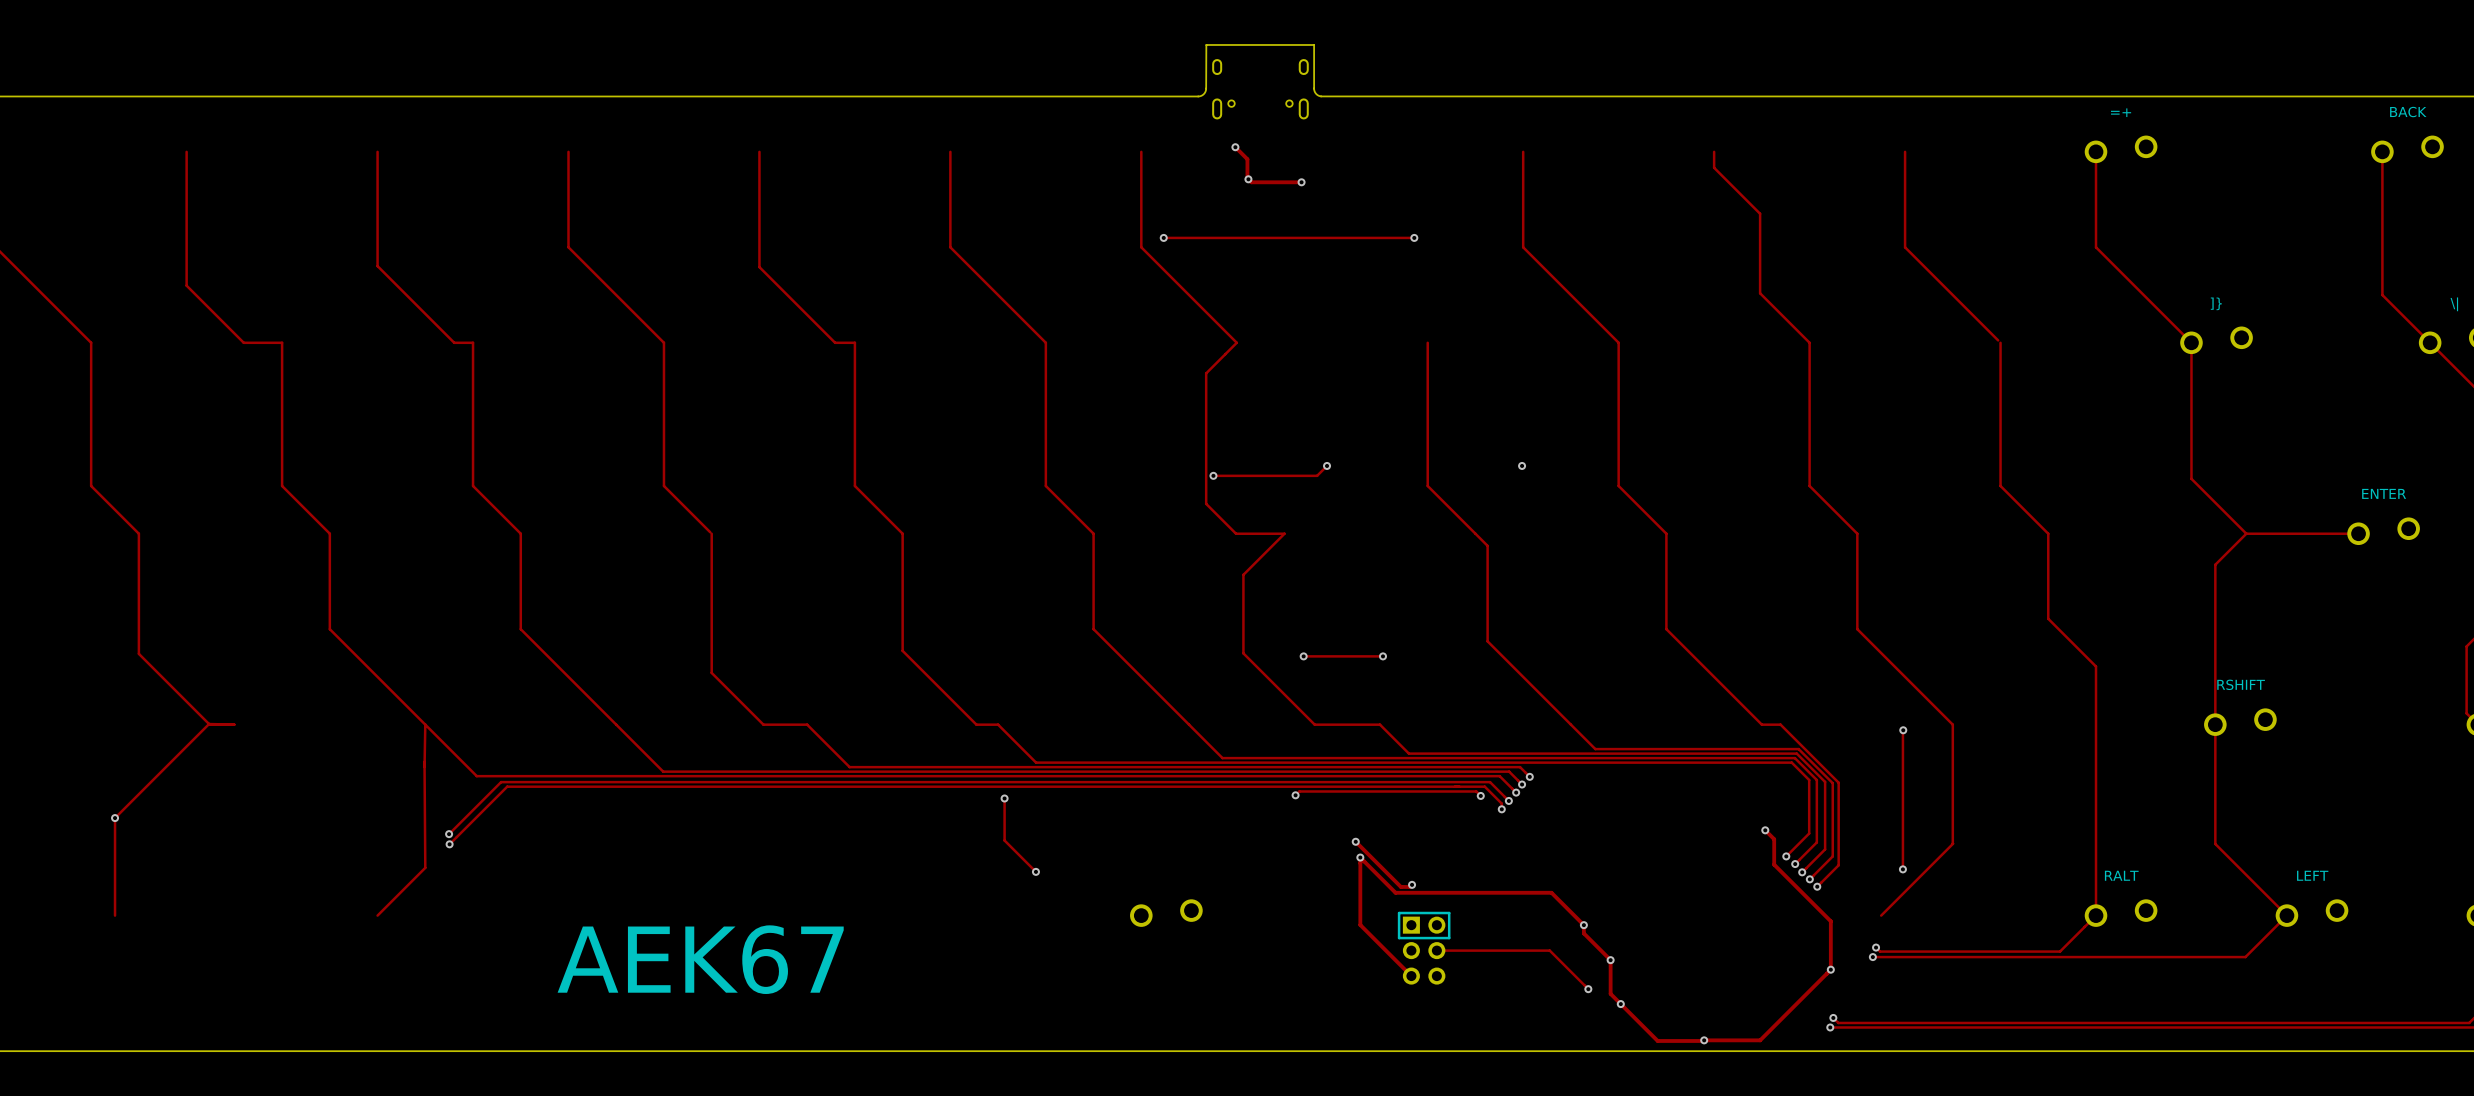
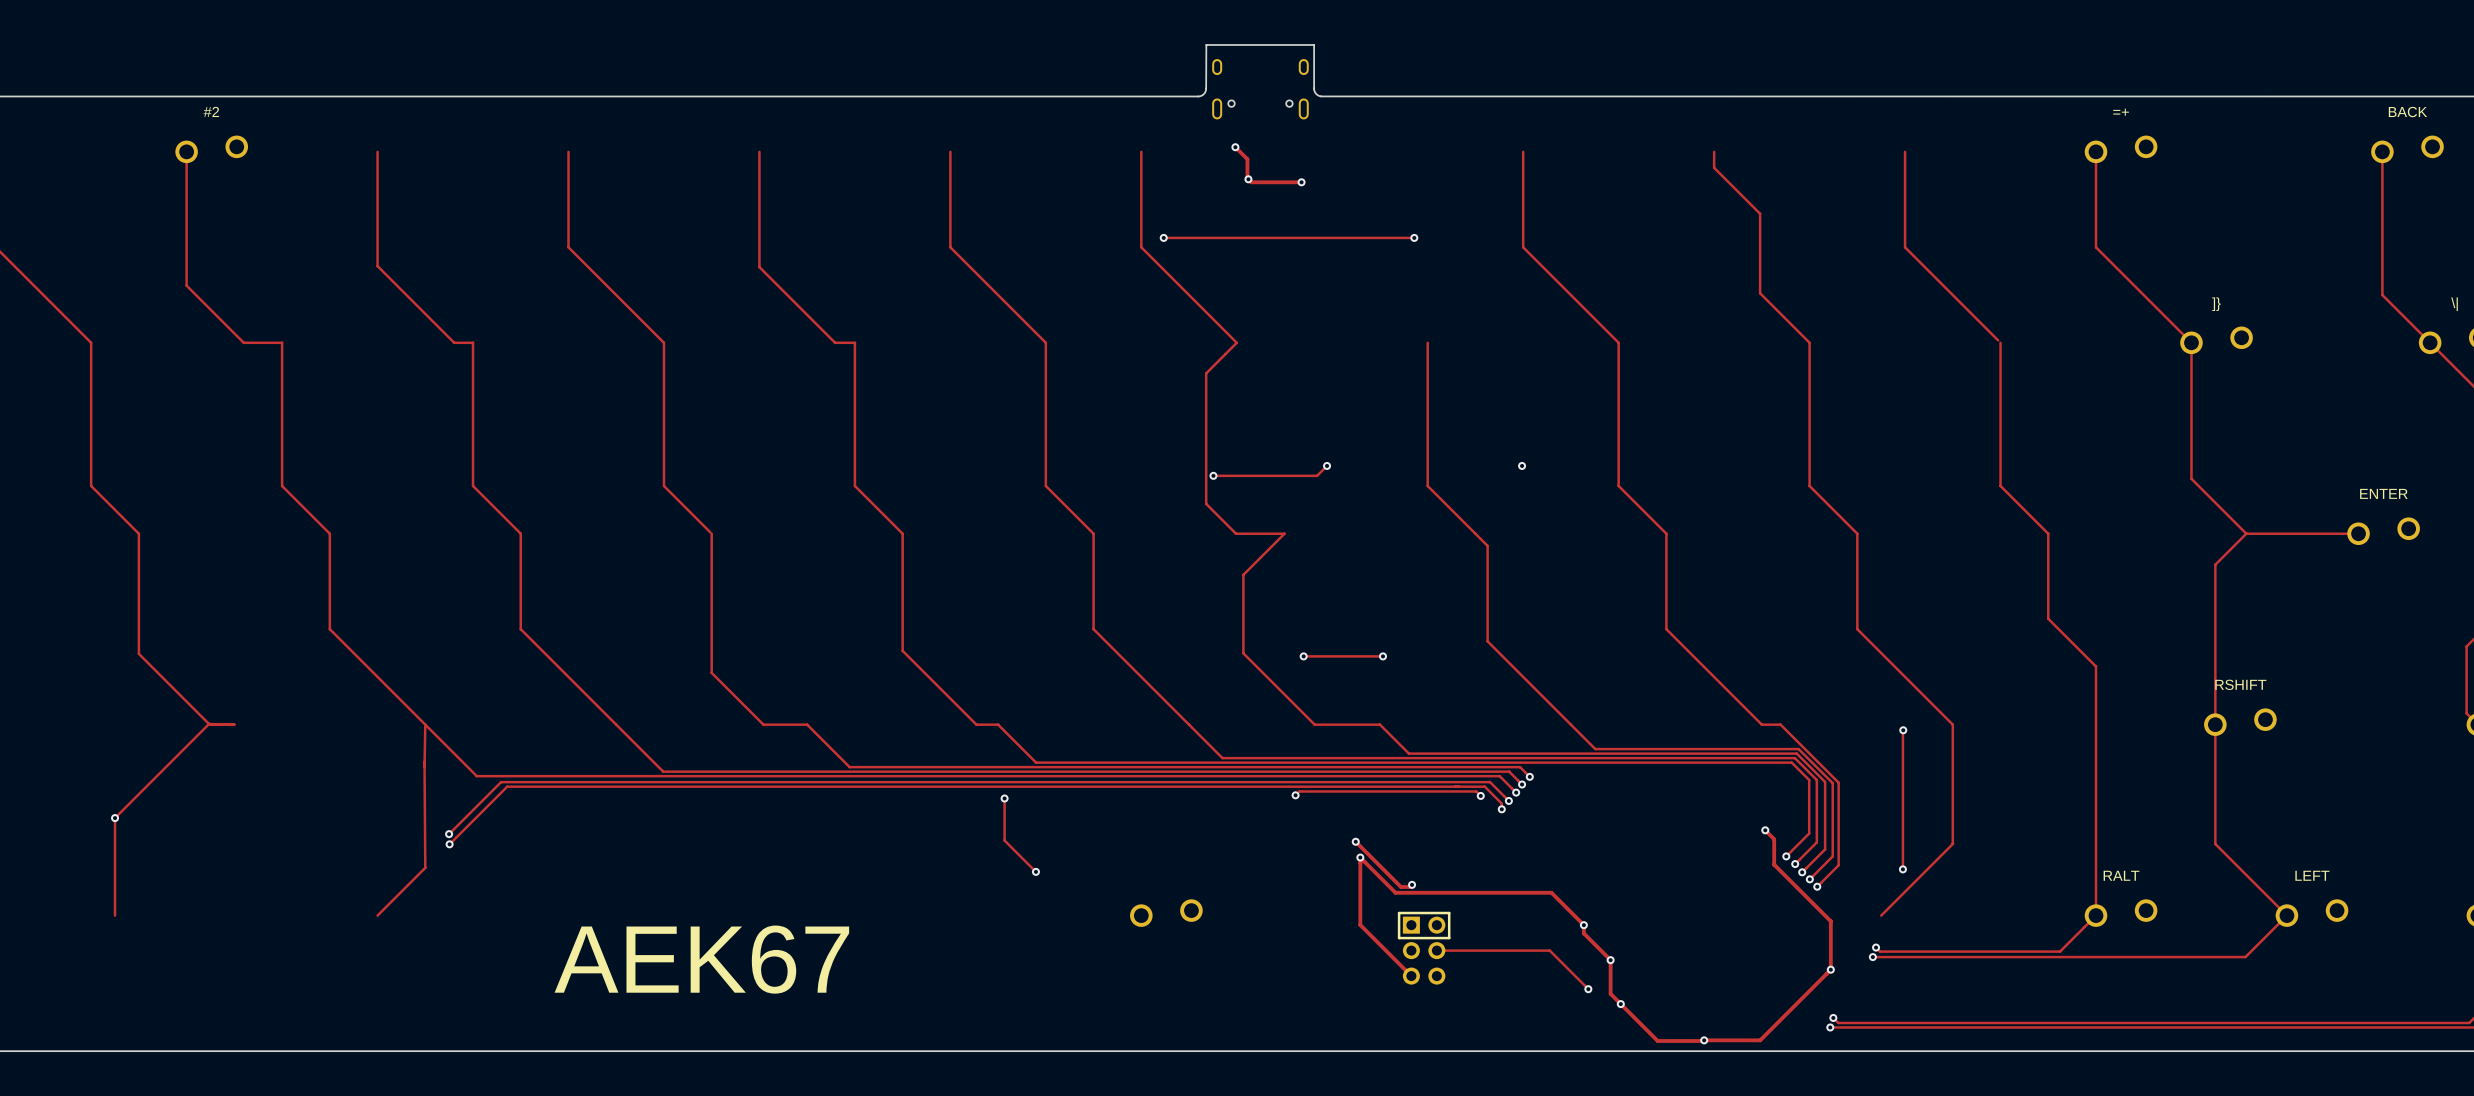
part: none -> #2 (211, 149)

